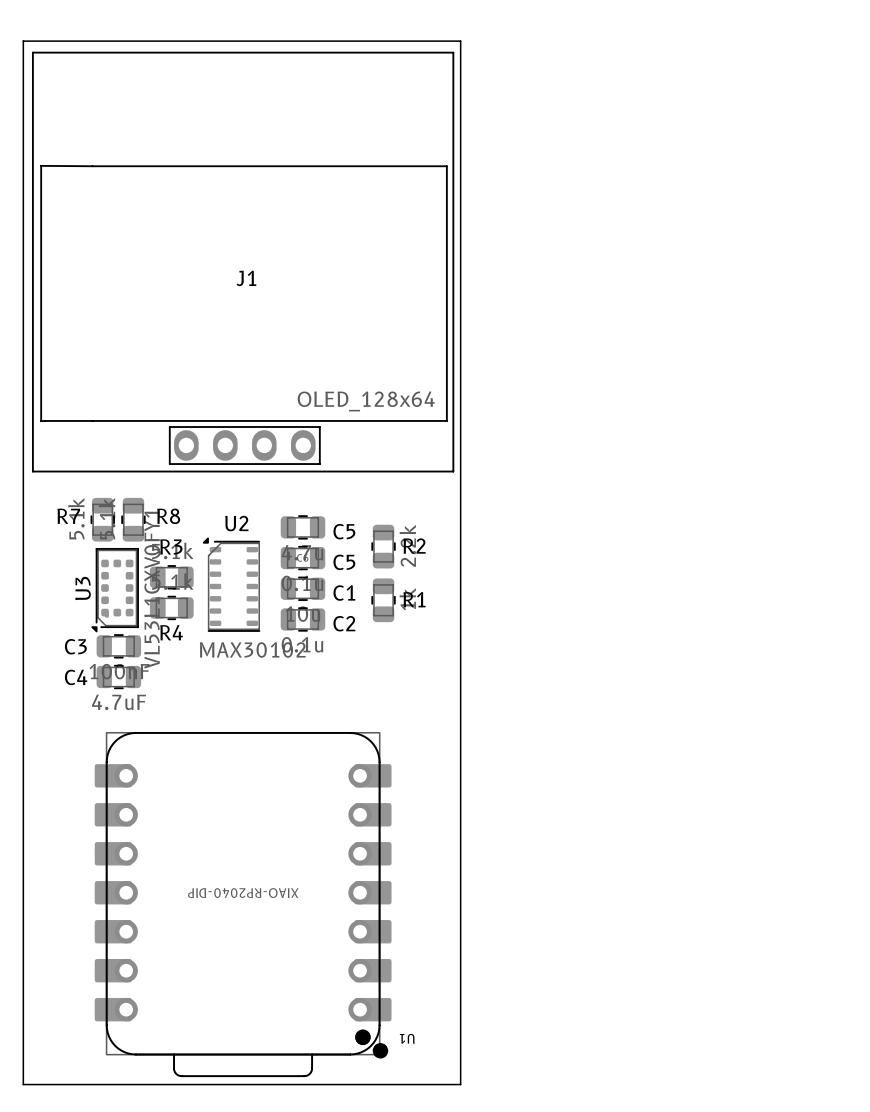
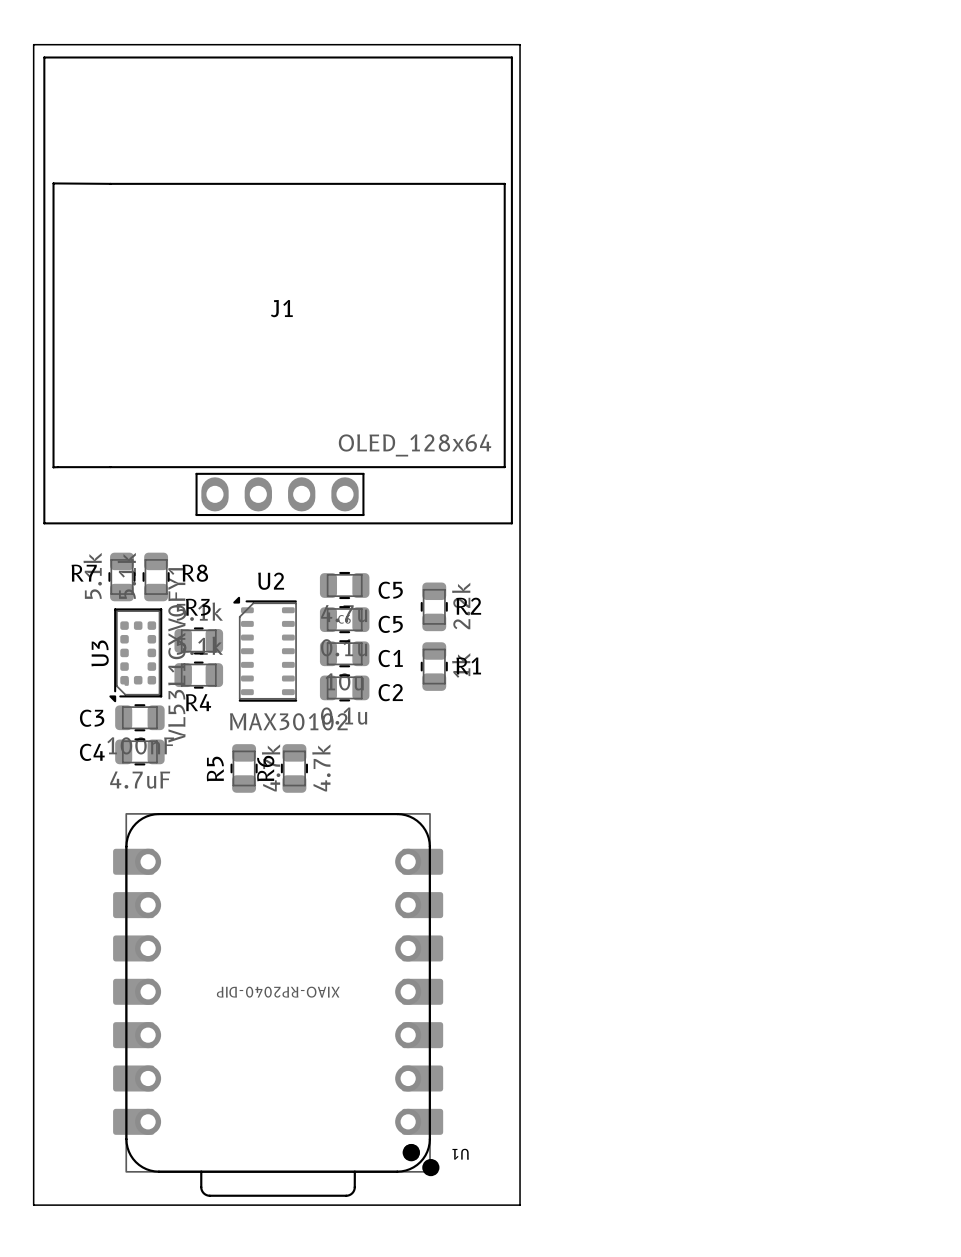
R5: none -> 4.7k (244, 768)
R6: none -> 4.7k (294, 768)

